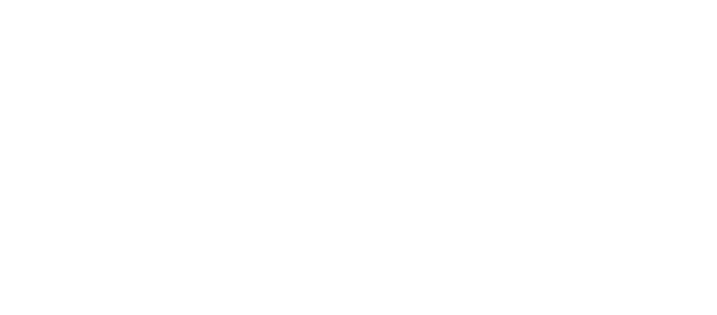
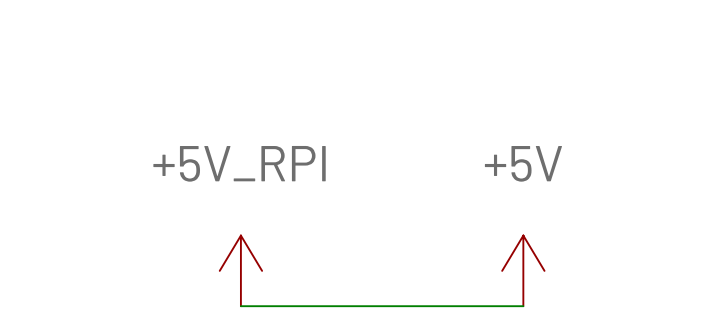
power symbol: none -> +5V_RPI (240, 270)
power symbol: none -> +5V (523, 270)
wire: none -> (240, 306) (523, 306)

